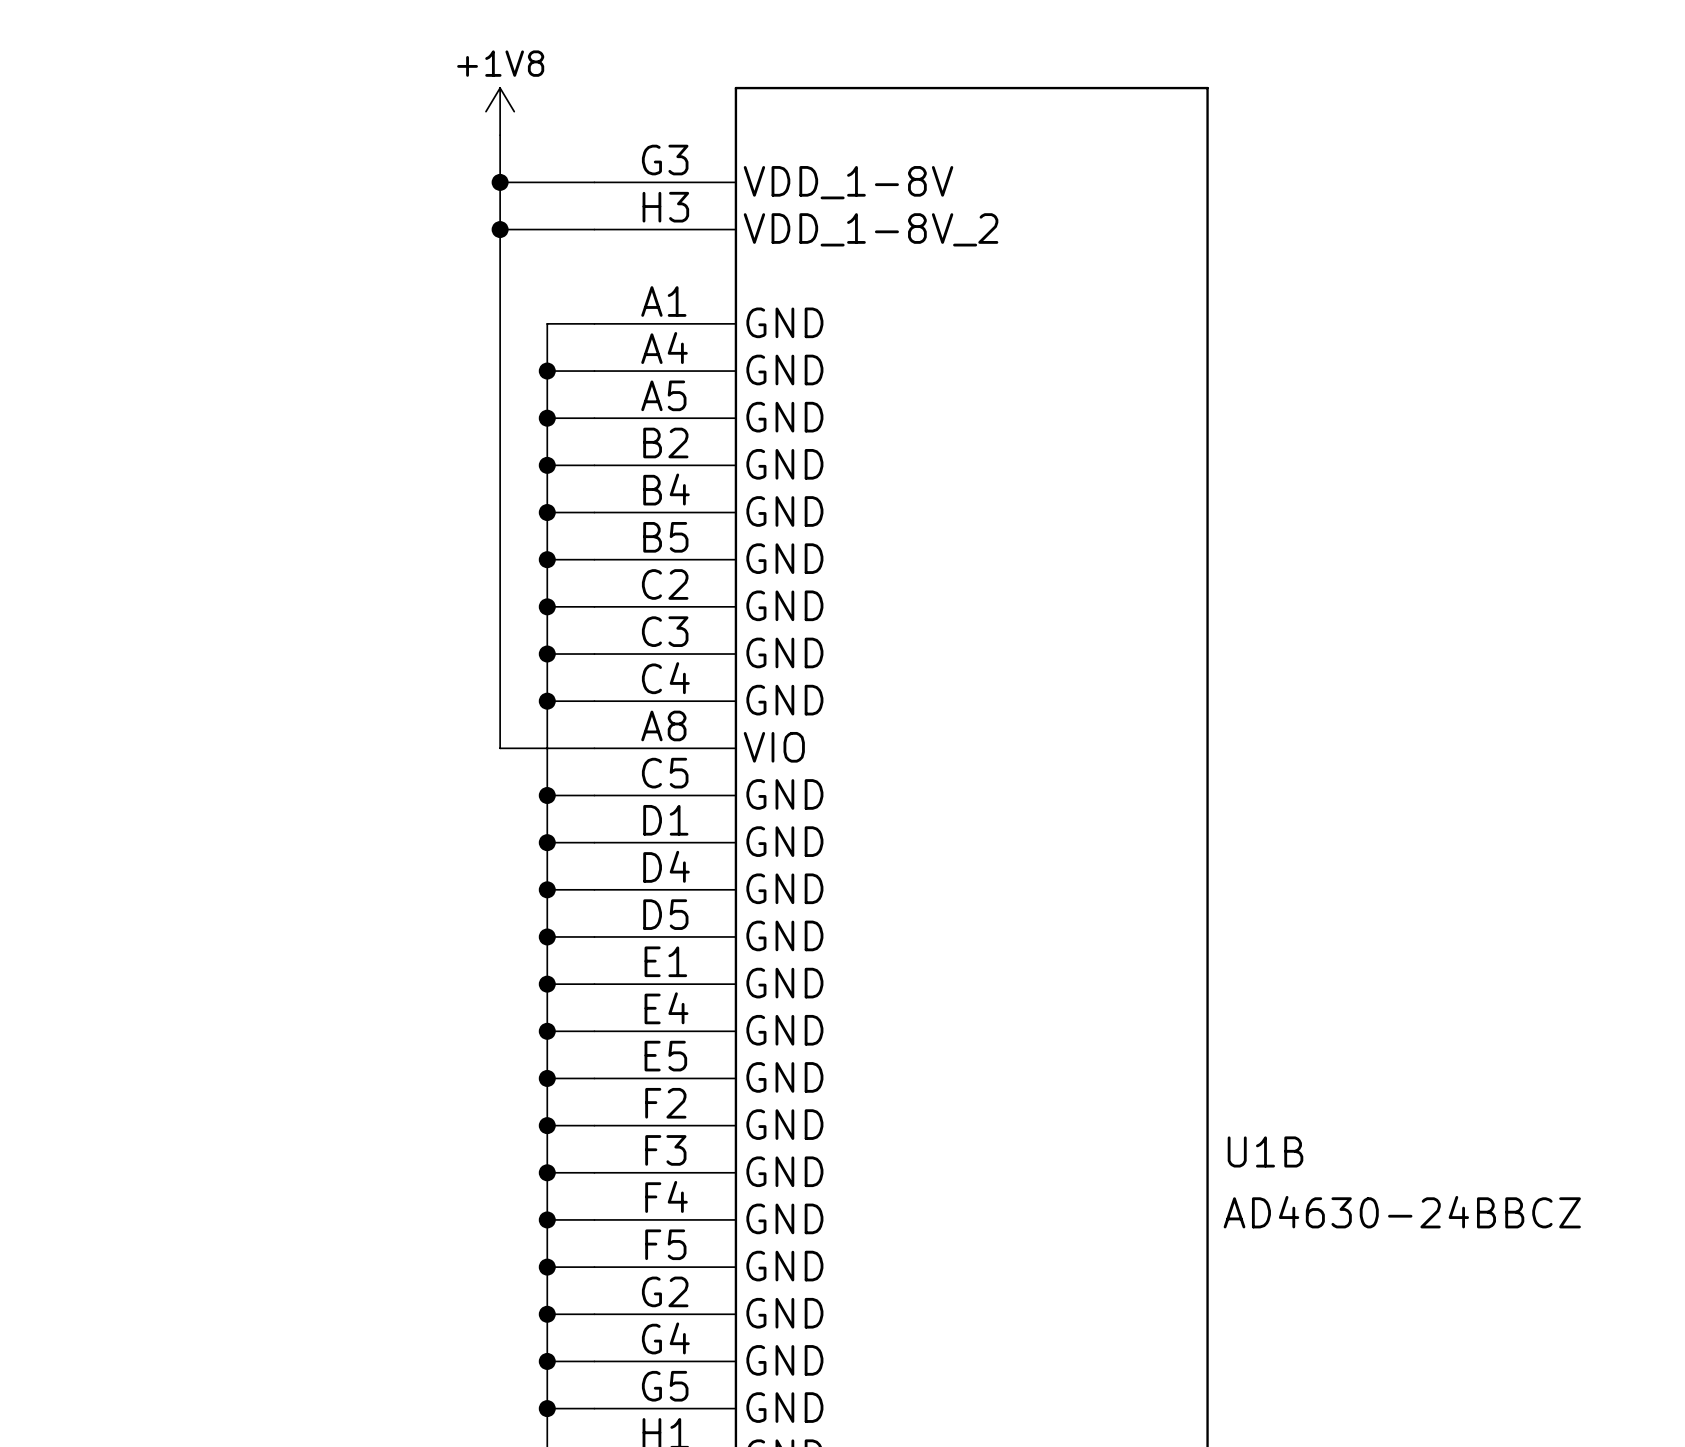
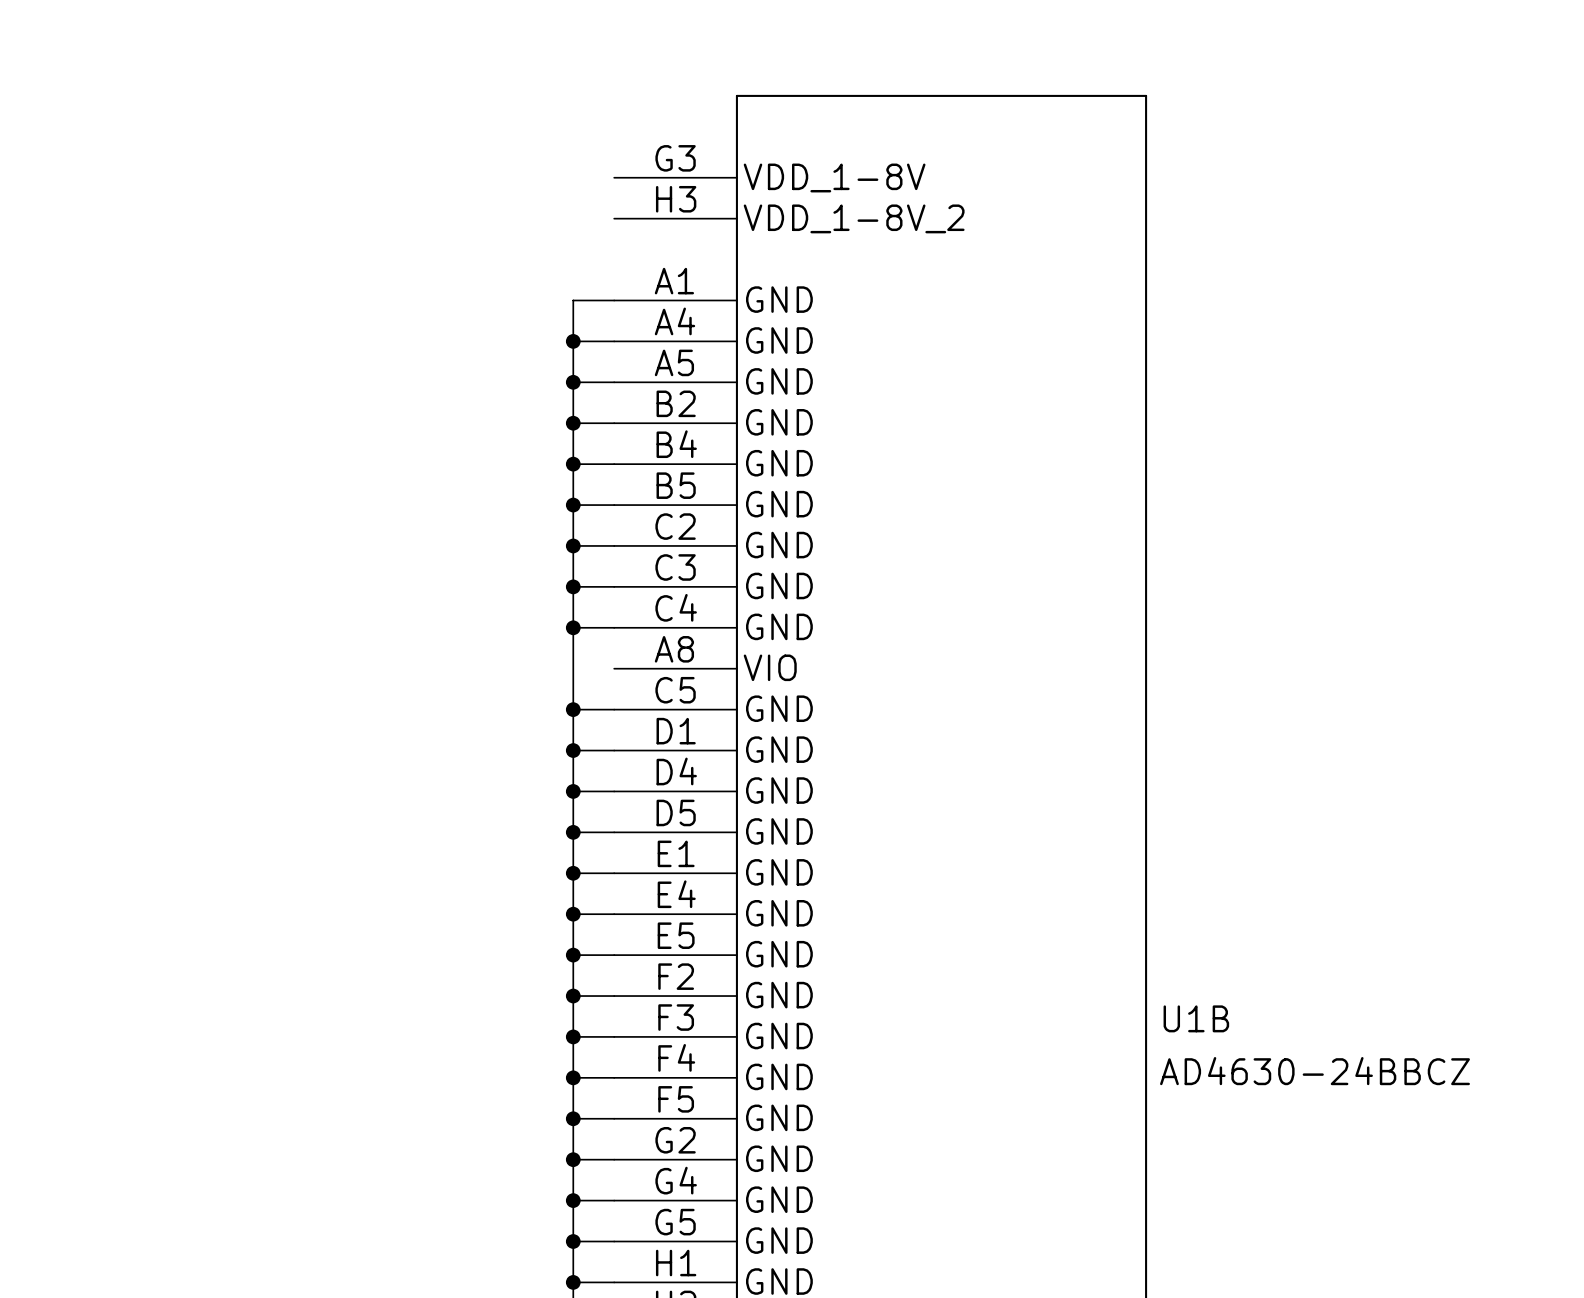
power symbol: +1V8 (500, 111) -> none
wire: (500, 135) (500, 748) (594, 748) -> none
wire: (500, 182) (594, 182) -> none
junction: (500, 182) -> none
wire: (500, 229) (594, 229) -> none
junction: (500, 229) -> none

